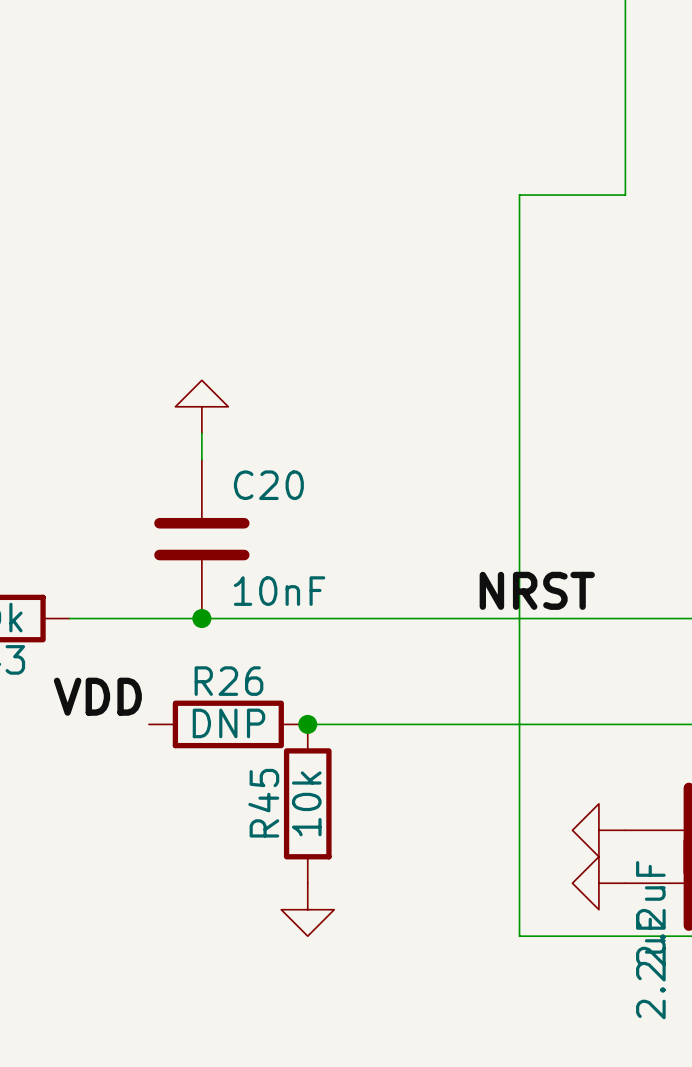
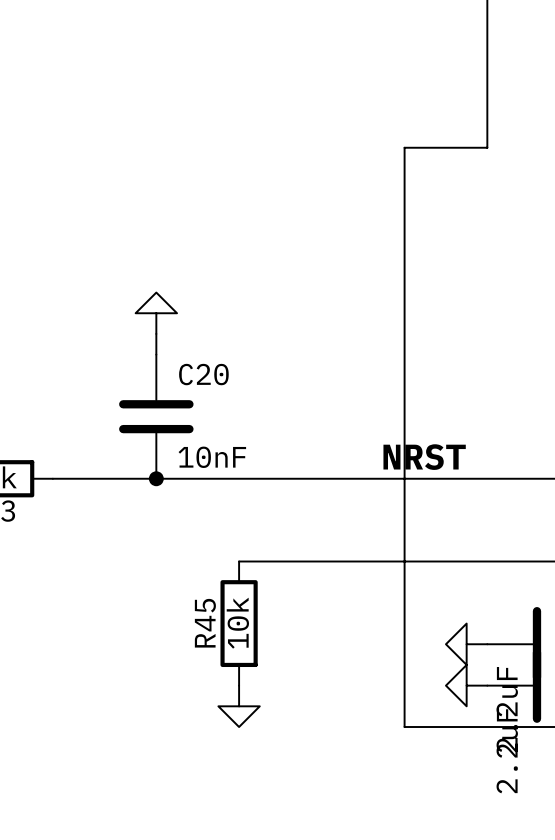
label: VDD (97, 696) -> none
R26: DNP (228, 724) -> none
junction: (307, 724) -> none

